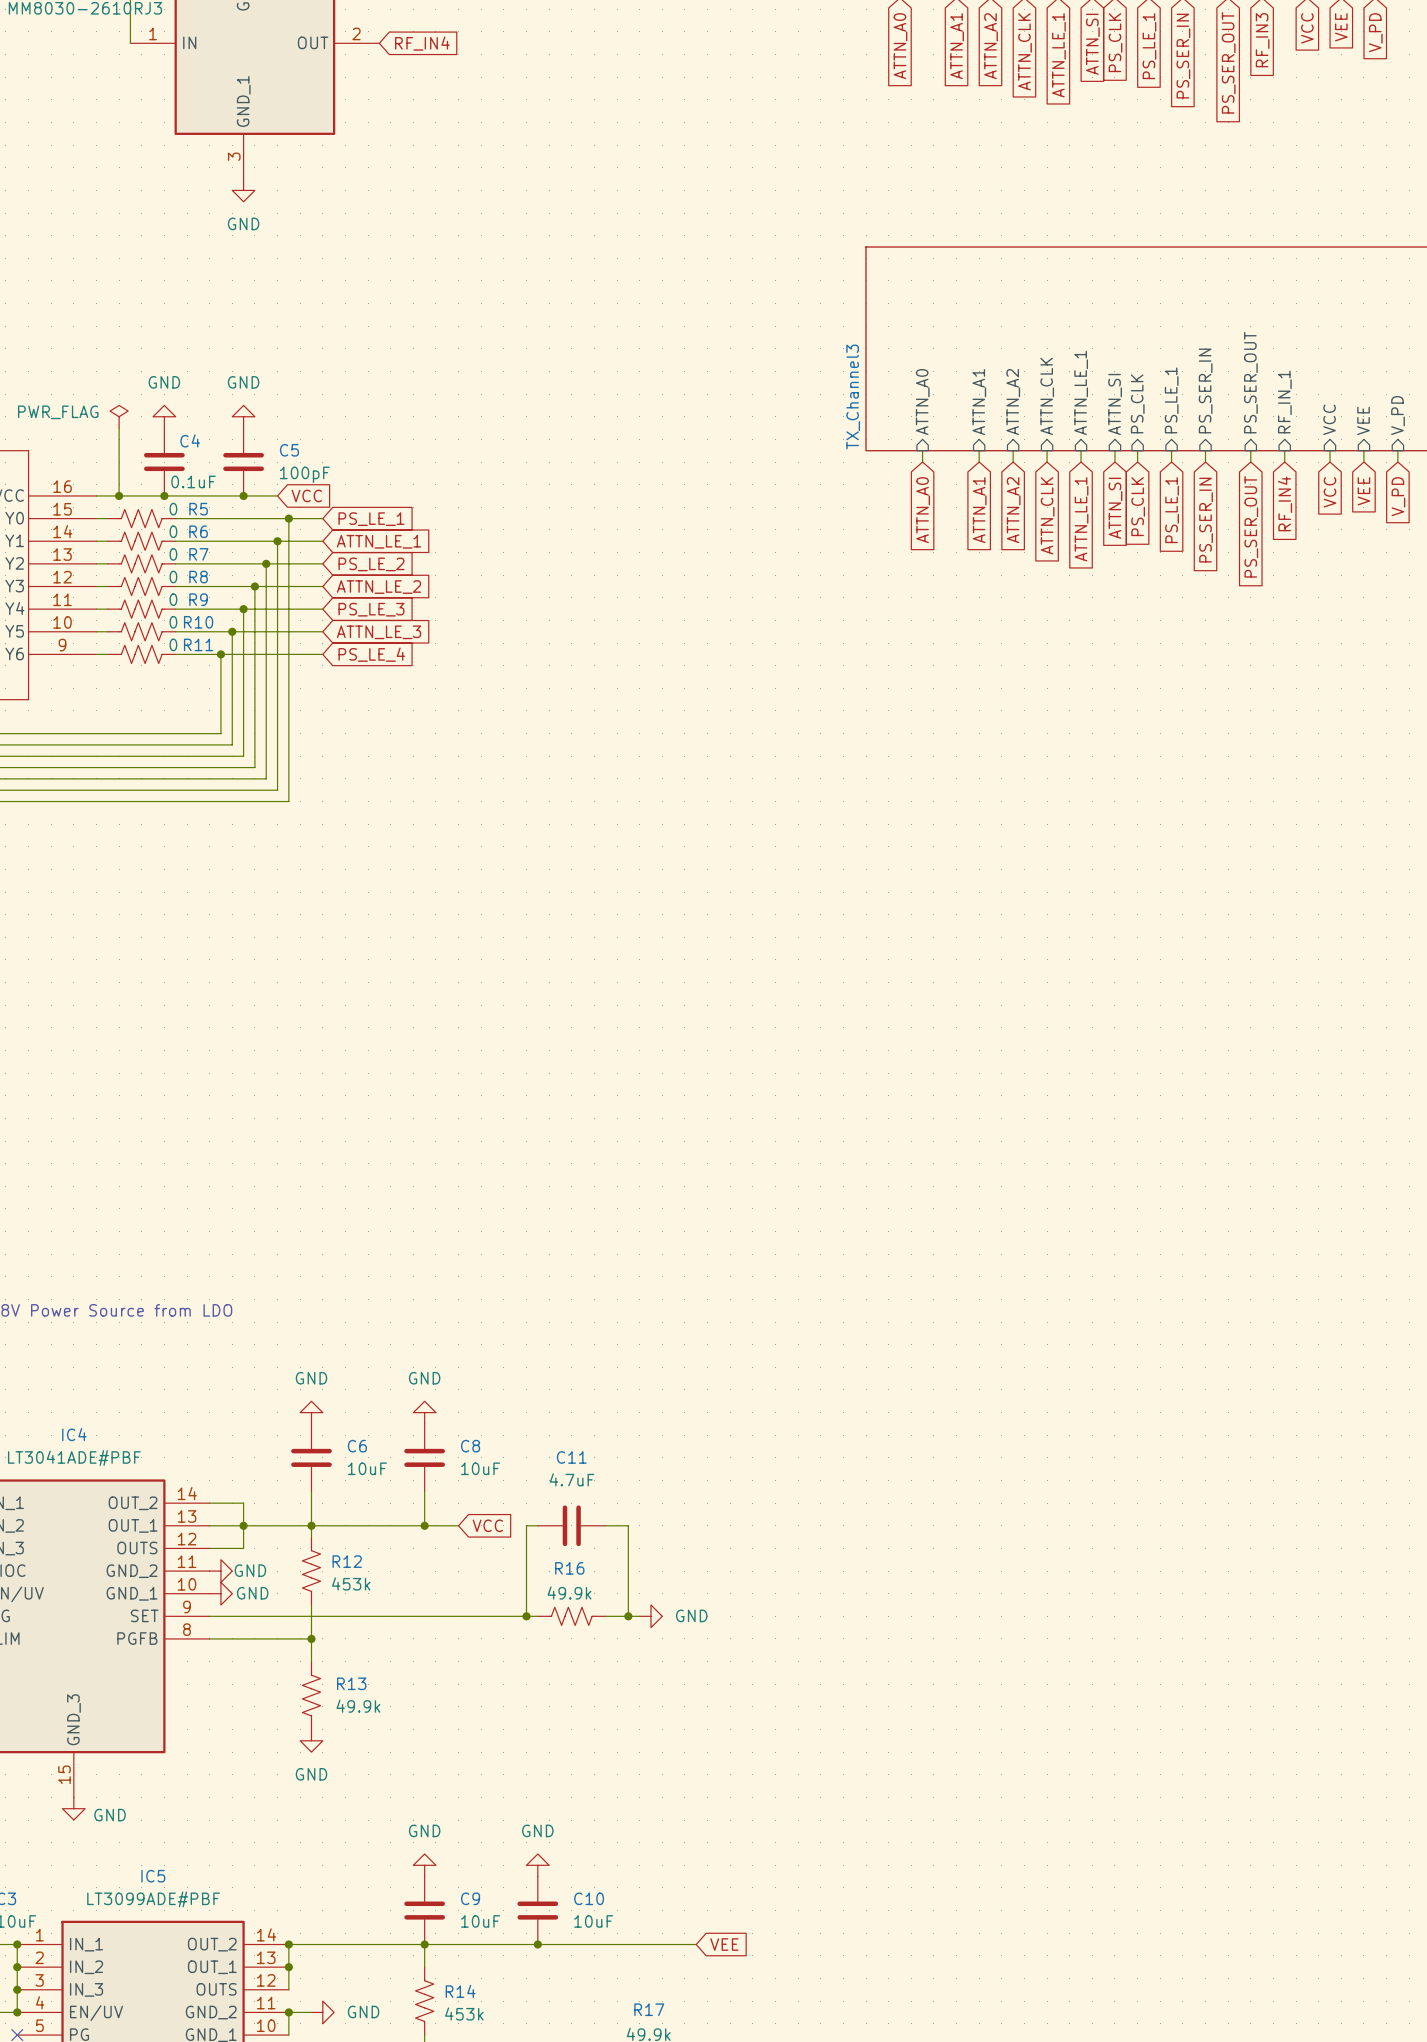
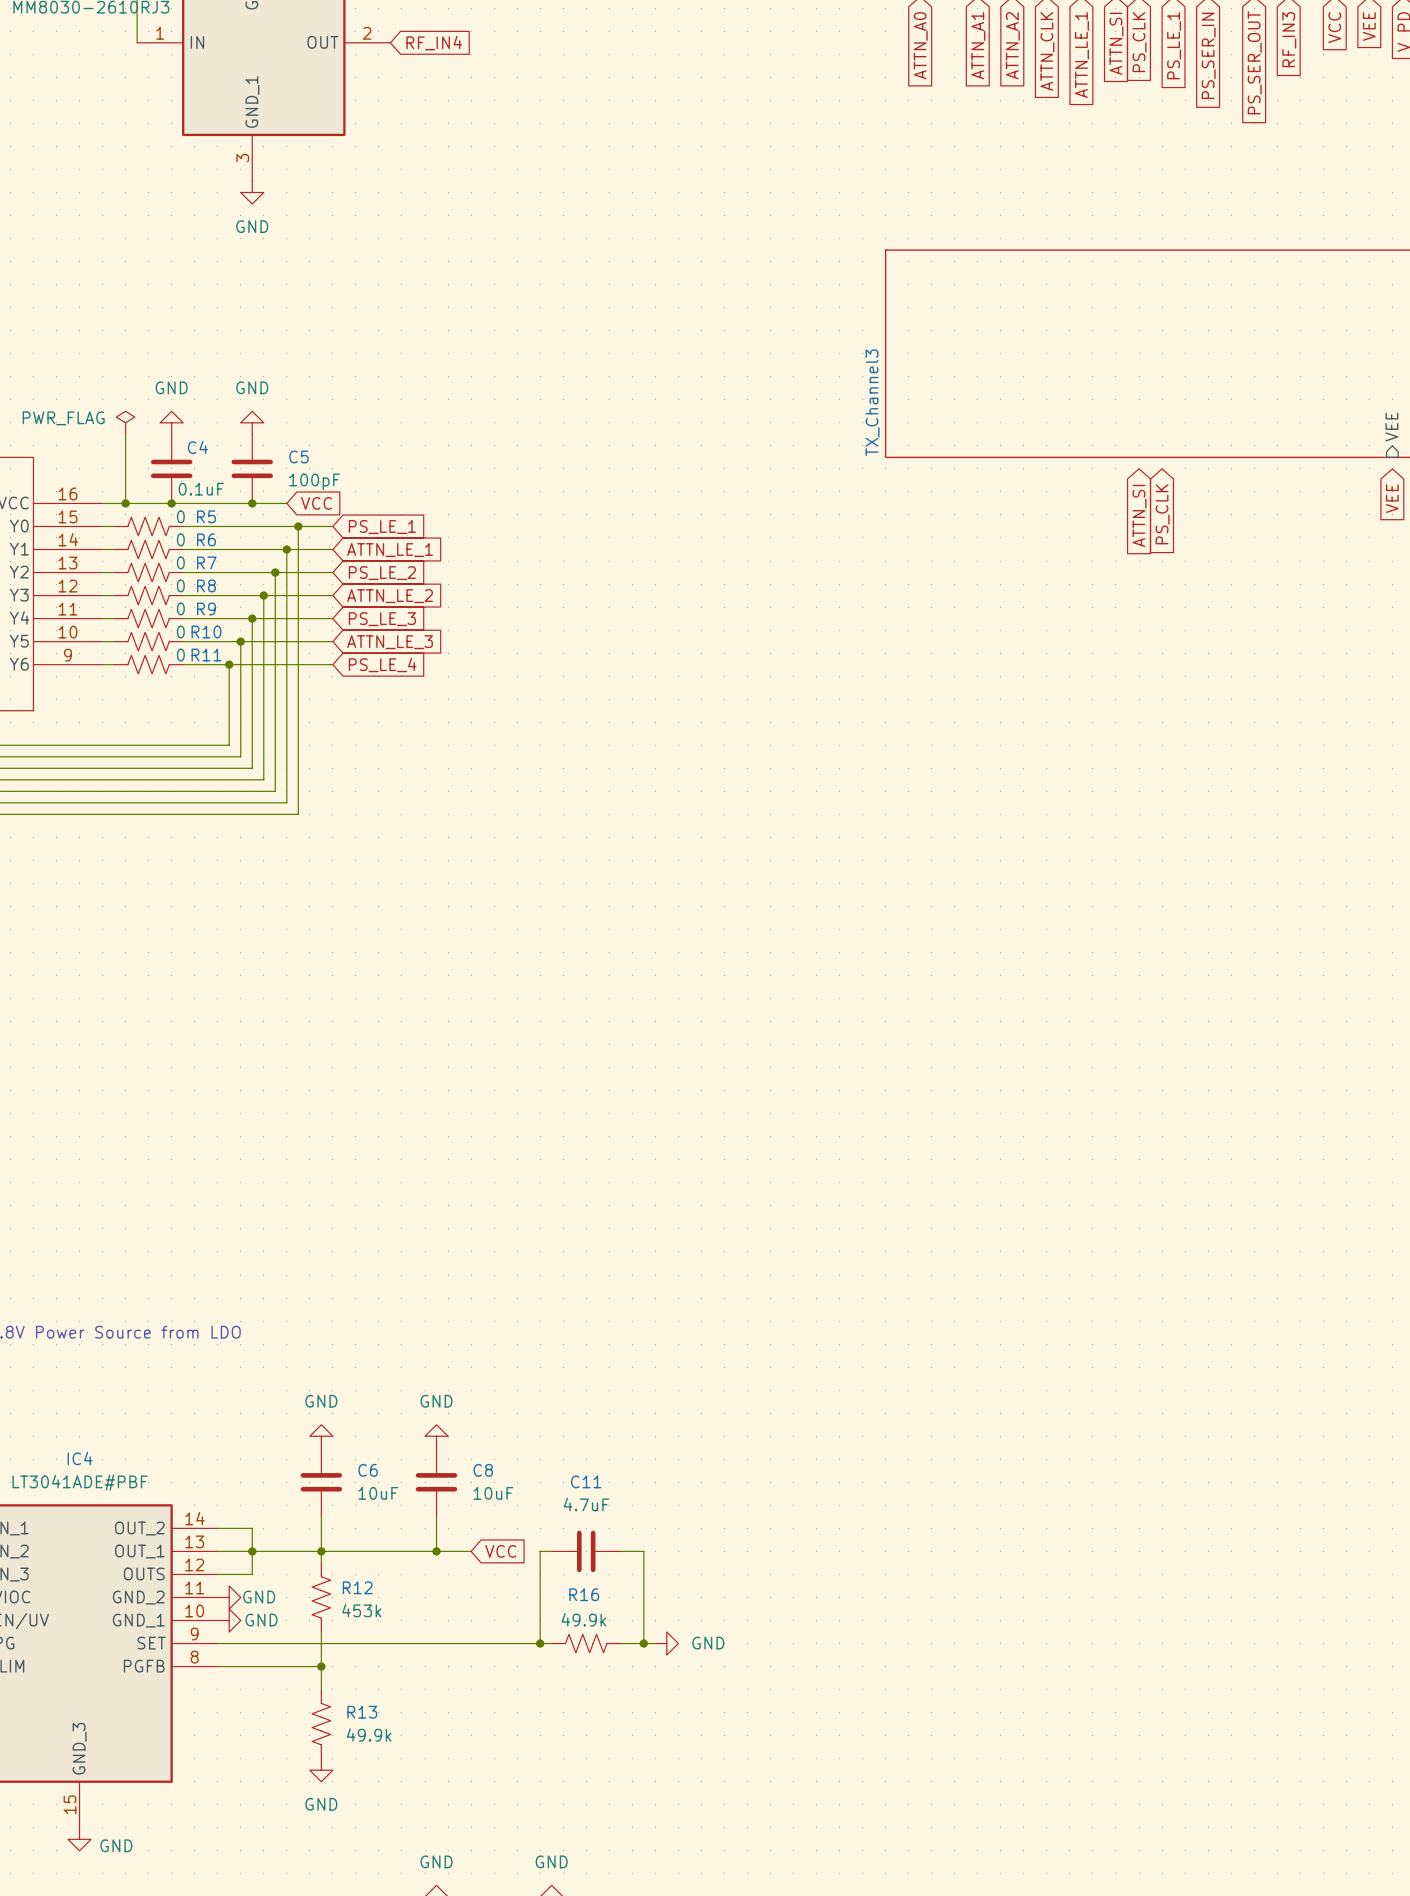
sheet pin: PS_SER_OUT (1250, 382) -> none
sheet pin: PS_SER_IN (1205, 390) -> none
sheet pin: ATTN_LE_1 (1081, 392) -> none
sheet pin: ATTN_CLK (1047, 396) -> none
sheet pin: PS_LE_1 (1171, 400) -> none
sheet pin: ATTN_A0 (922, 402) -> none
sheet pin: ATTN_A1 (979, 402) -> none
sheet pin: ATTN_A2 (1013, 402) -> none
sheet pin: RF_IN_1 (1284, 402) -> none
sheet pin: PS_CLK (1137, 403) -> none
sheet pin: ATTN_SI (1115, 404) -> none
sheet pin: VCC (1329, 419) -> none
wire: (922, 450) (922, 462) -> none
wire: (979, 450) (979, 462) -> none
wire: (1013, 450) (1013, 462) -> none
wire: (1047, 450) (1047, 462) -> none
wire: (1081, 450) (1081, 462) -> none
wire: (1114, 450) (1114, 462) -> none
wire: (1137, 450) (1137, 462) -> none
wire: (1171, 450) (1171, 462) -> none
wire: (1205, 450) (1205, 462) -> none
wire: (1250, 450) (1250, 462) -> none
wire: (1284, 450) (1284, 462) -> none
wire: (1329, 450) (1329, 462) -> none
wire: (1363, 450) (1363, 462) -> none
global label: VCC (1329, 492) -> none
global label: RF_IN4 (1284, 503) -> none
global label: ATTN_A0 (923, 510) -> none
global label: ATTN_A1 (979, 510) -> none
global label: ATTN_A2 (1013, 510) -> none
global label: PS_LE_1 (1172, 510) -> none
global label: ATTN_CLK (1047, 515) -> none
global label: ATTN_LE_1 (1081, 519) -> none
global label: PS_SER_IN (1206, 520) -> none
global label: PS_SER_OUT (1251, 526) -> none

